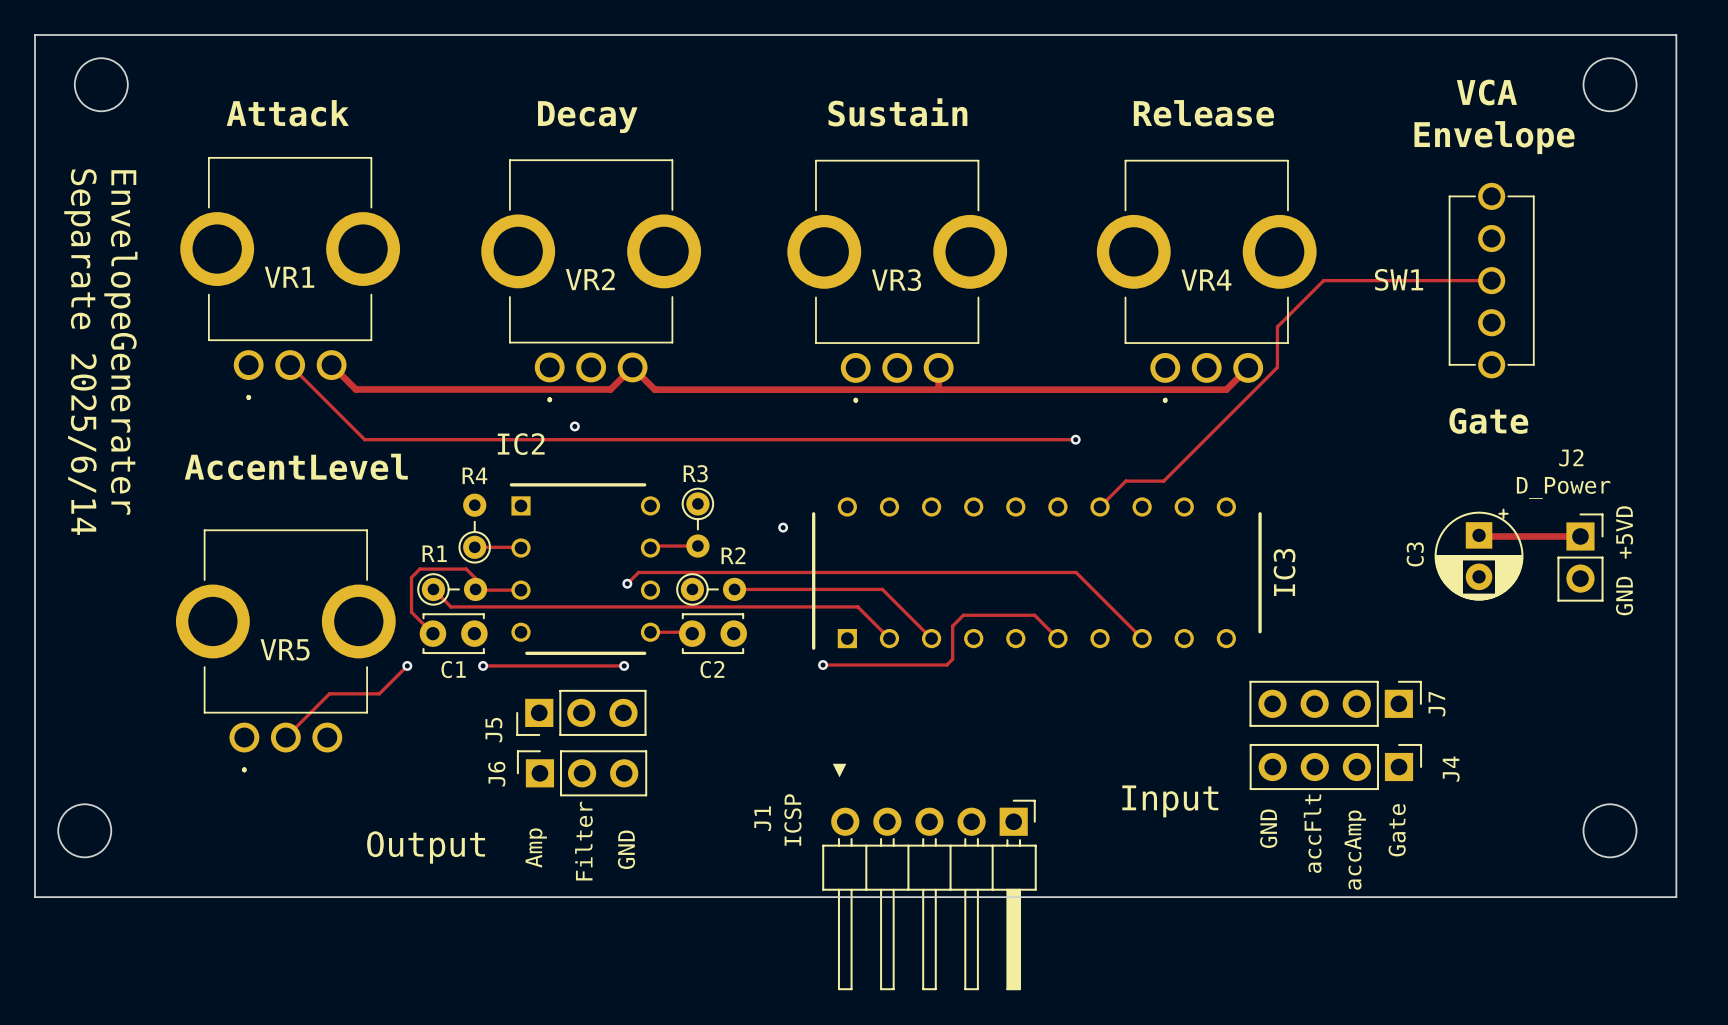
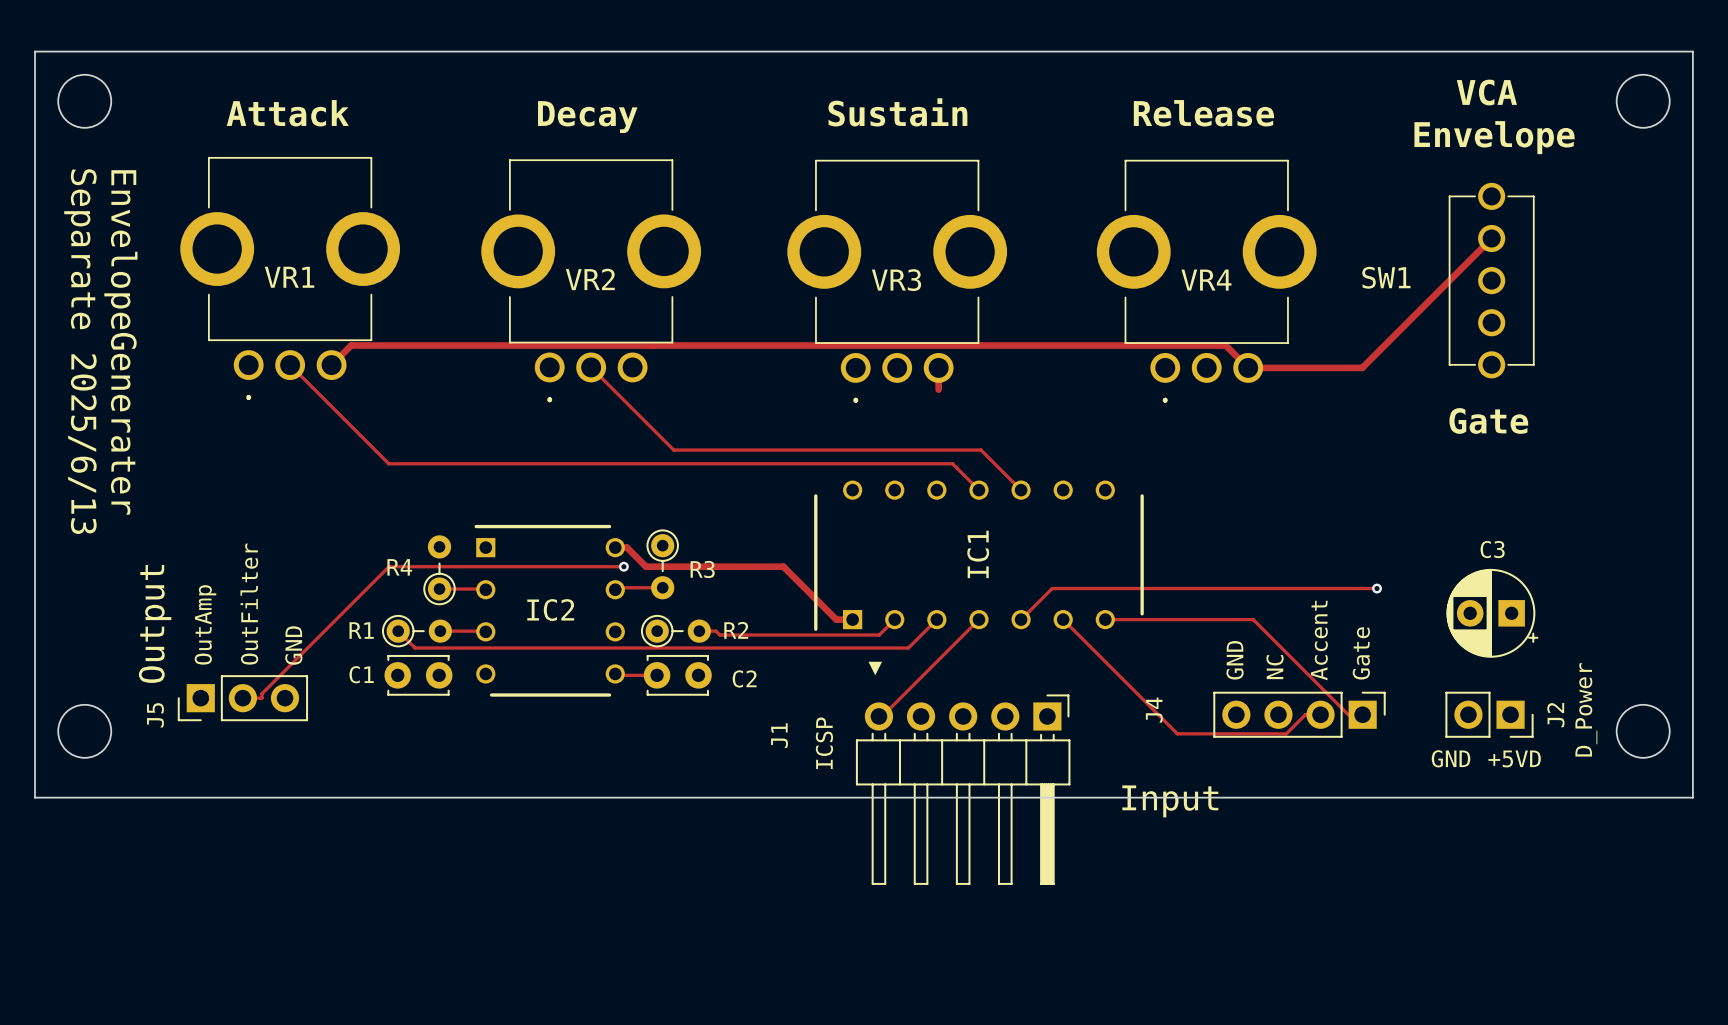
board edge: (35, 51) (35, 35) (1676, 35) (1676, 897) (35, 897) (35, 797) -> (35, 51) (1692, 51) (1692, 797) (35, 797)
round board edge position: (101, 84) -> (84, 101)
round board edge position: (1610, 84) -> (1643, 101)
SW1 name position: SW1 (1399, 279) -> SW1 (1386, 277)
track: (1491, 280) (1323, 280) (1277, 326) (1277, 367) (1163, 481) (1125, 481) (1100, 506) -> none
text: Separate 2025/6/14 (80, 352) -> Separate 2025/6/13 (80, 351)
track: (331, 365) (355, 389) (610, 389) (632, 367) (654, 389) (1226, 389) (1248, 367) -> (331, 365) (351, 345) (1225, 345) (1248, 367) (1362, 367) (1491, 238)
track: none -> (591, 367) (673, 450) (981, 450) (1021, 490)
via: (574, 426) -> none
track: (364, 439) (1075, 439) -> (364, 439) (388, 463) (952, 463) (978, 490)
via: (1075, 439) -> none
IC2 name position: IC2 (521, 444) -> IC2 (550, 610)
text: AccentLevel (296, 466) -> none
R3 name position: R3 (695, 473) -> R3 (702, 569)
R4 name position: R4 (474, 475) -> R4 (399, 567)
text rotation: 0° (1563, 487) -> 90° counterclockwise (1586, 709)
text position: D_Power (1563, 487) -> D_Power (1586, 709)
R3 position: (697, 522) -> (662, 564)
via: (783, 527) -> none
R4 position: (474, 528) -> (439, 570)
text rotation: 0° (1624, 532) -> 90° clockwise (1514, 758)
text position: +5VD (1624, 532) -> +5VD (1514, 758)
track: (1479, 535) (1580, 536) -> none
track: (697, 546) (652, 546) (650, 548) -> (662, 587) (617, 587) (615, 589)
track: (474, 547) (521, 548) -> (439, 589) (485, 589)
track: none -> (615, 547) (626, 547) (646, 566) (783, 566) (836, 619) (852, 619)
R1 name position: R1 (434, 553) -> R1 (361, 630)
C3 rotation: 0° (1479, 554) -> 90° clockwise (1492, 613)
C3 position: (1479, 554) -> (1492, 613)
R2 name position: R2 (733, 555) -> R2 (736, 630)
IC1: none -> (978, 555)
J2 rotation: 0° (1580, 557) -> 90° clockwise (1489, 714)
J2 position: (1580, 557) -> (1489, 714)
track: none -> (623, 566) (389, 566) (261, 693) (261, 698) (242, 698)
IC2 position: (584, 569) -> (549, 610)
IC3: (1036, 573) -> none
track: (627, 583) (638, 572) (1076, 572) (1142, 638) -> none
via position: (627, 583) -> (623, 566)
track: none -> (1377, 588) (1052, 588) (1021, 619)
via: none -> (1377, 588)
track: (433, 589) (450, 606) (857, 606) (889, 638) -> none
R1 position: (452, 589) -> (416, 631)
R2 position: (711, 589) -> (675, 631)
track: (734, 589) (882, 589) (931, 638) -> none
track: (521, 590) (476, 590) (475, 578) (466, 569) (419, 569) (411, 577) (411, 612) (432, 633) -> none
text: GND (1624, 596) -> none
text: none -> OutFilter (249, 604)
track: none -> (894, 619) (879, 635) (719, 635) (715, 631) (699, 631)
track: none -> (936, 619) (908, 648) (415, 648) (398, 631)
track: none -> (978, 619) (882, 716) (878, 716)
track: none -> (1063, 619) (1177, 733) (1286, 733) (1305, 714) (1320, 714)
track: none -> (1105, 619) (1253, 619) (1348, 714) (1362, 714)
text: none -> OutAmp (205, 624)
track: none -> (440, 631) (485, 631)
track: (650, 632) (692, 633) -> none
C1 position: (453, 633) -> (418, 675)
C2 position: (712, 633) -> (677, 675)
track: (1057, 638) (1034, 615) (963, 615) (952, 626) (952, 659) (946, 665) (822, 665) -> none
text: none -> Accent (1319, 640)
text: none -> GND (293, 645)
VR5: (285, 650) -> none
text: none -> GND (1235, 660)
via: (407, 665) -> none
track: (408, 665) (379, 693) (329, 693) (285, 737) -> none
track: (483, 665) (624, 665) -> none
via: (483, 665) -> none
via: (624, 665) -> none
via: (823, 665) -> none
text: none -> NC (1275, 667)
C1 name position: C1 (453, 669) -> C1 (361, 674)
C2 name position: C2 (712, 669) -> C2 (744, 678)
track: none -> (615, 673) (657, 675)
J7: (1335, 703) -> none
J5 position: (581, 712) -> (242, 698)
text: none -> GND (1451, 758)
J4 position: (1335, 767) -> (1299, 714)
J4 name position: J4 (1451, 769) -> J4 (1154, 710)
text position: ▼ (839, 770) -> ▼ (875, 668)
J6: (582, 773) -> none
J1 name position: J1 (762, 818) -> J1 (779, 735)
text position: ICSP (792, 819) -> ICSP (824, 743)
text: GND (1268, 828) -> none
round board edge position: (84, 830) -> (84, 731)
text position: Gate (1397, 830) -> Gate (1361, 653)
round board edge position: (1610, 830) -> (1643, 731)
text: accFlt (1312, 833) -> none
text: Filter (583, 841) -> none
text rotation: 0° (426, 847) -> 90° counterclockwise (155, 623)
text position: Output (426, 847) -> Output (155, 623)
text: Amp (536, 848) -> none
text: GND (626, 849) -> none
text: accAmp (1355, 850) -> none
J1 position: (929, 894) -> (963, 789)

